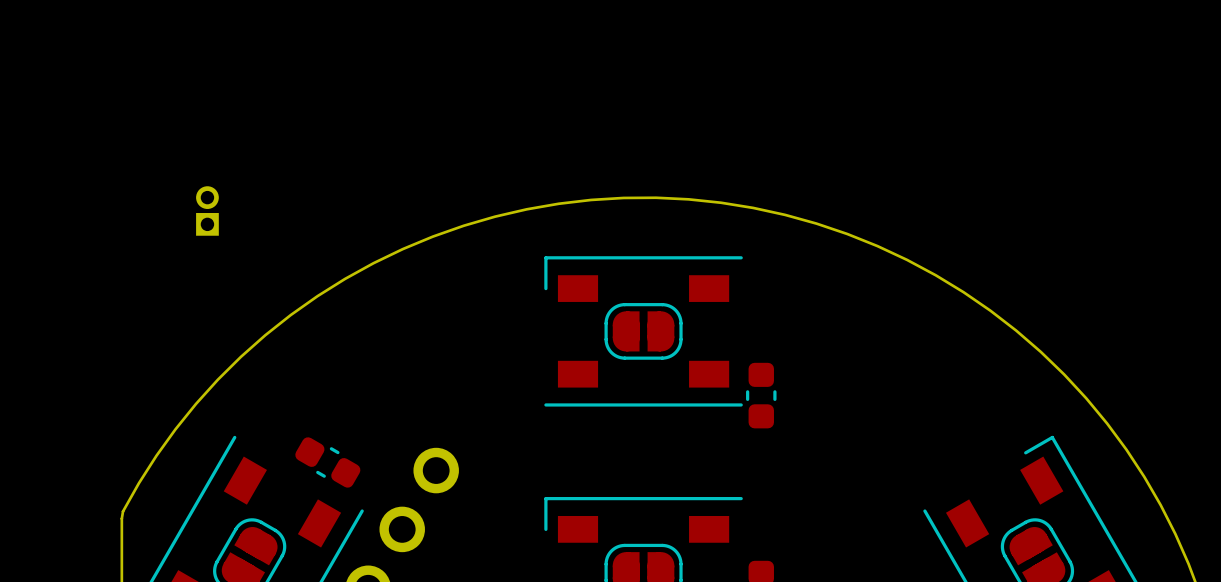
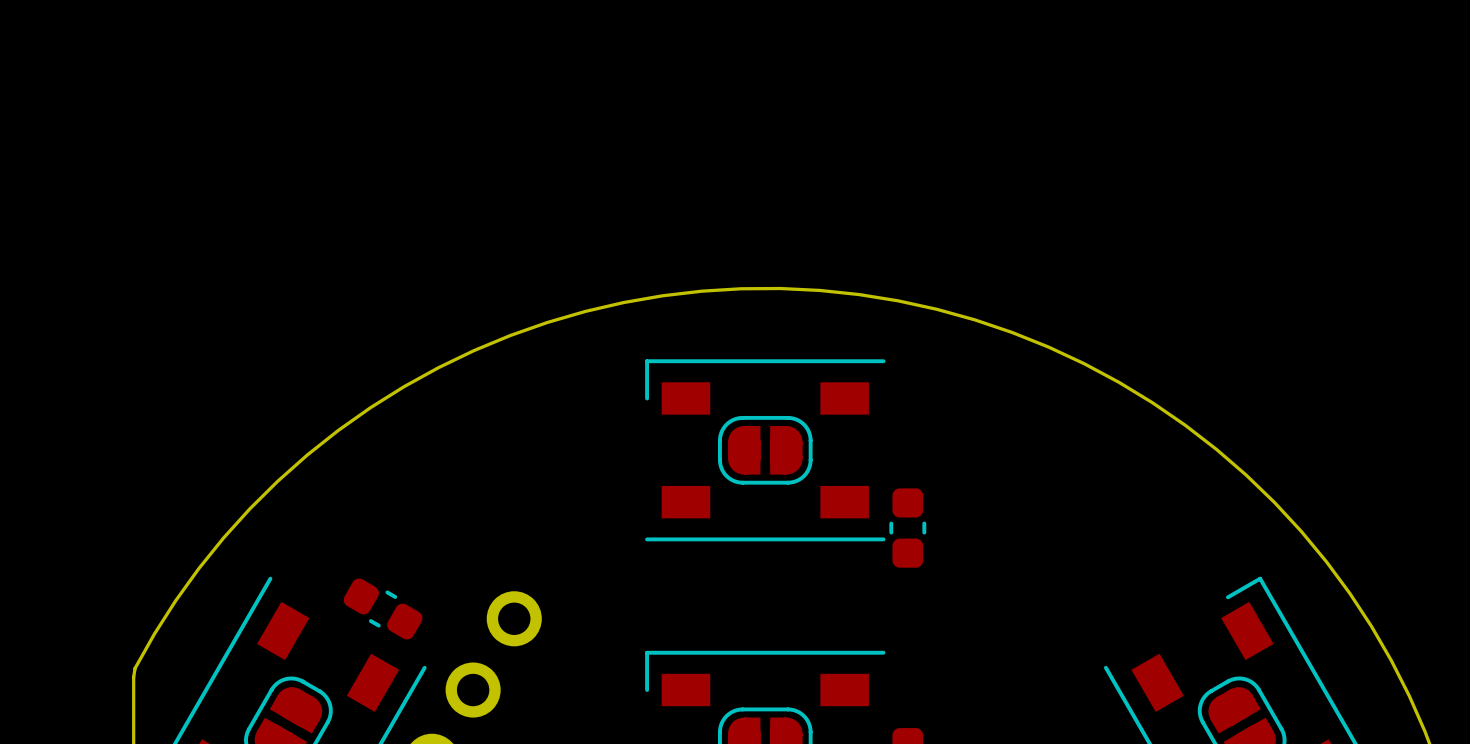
part: (207, 210) -> none

